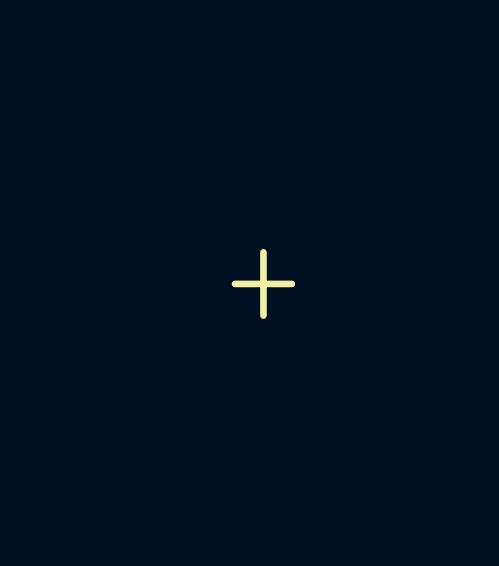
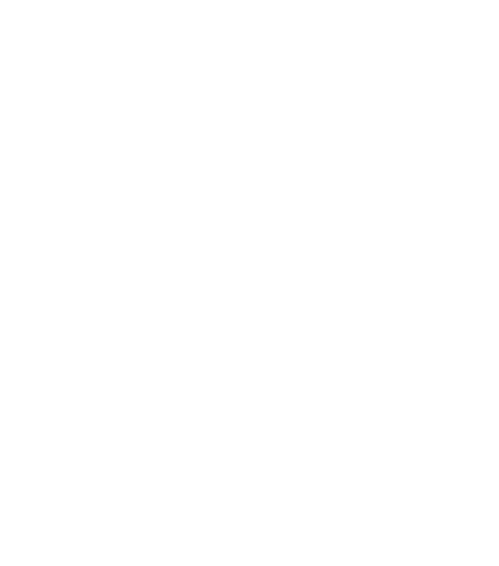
text: + (263, 283) -> none

